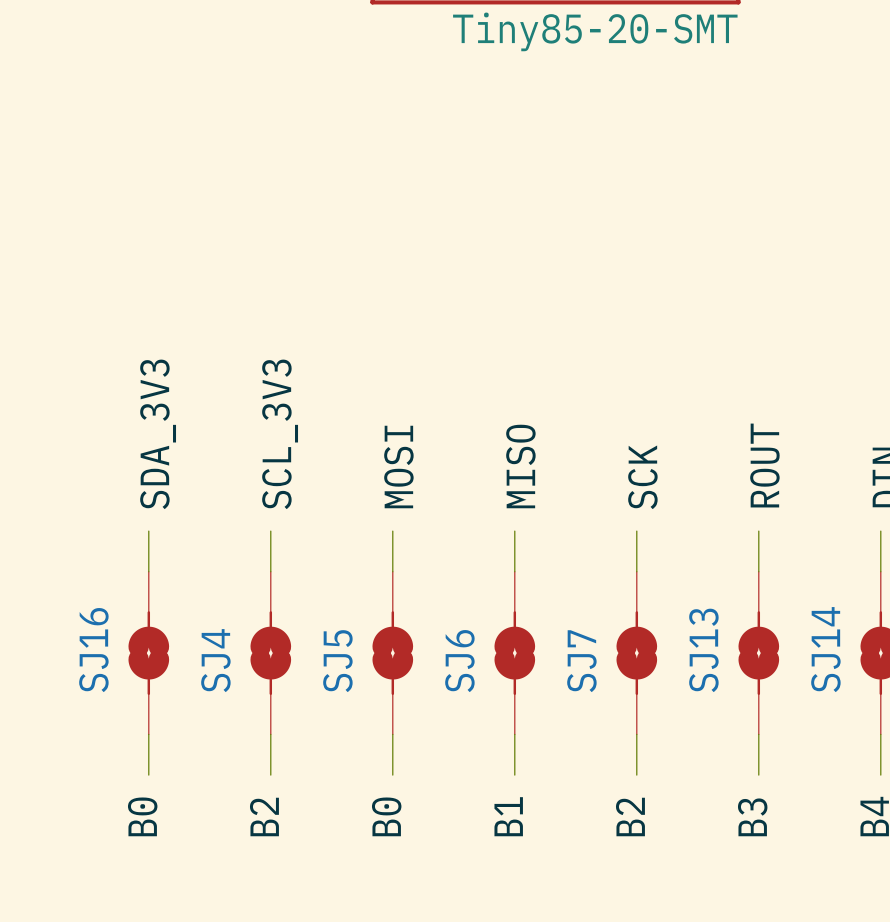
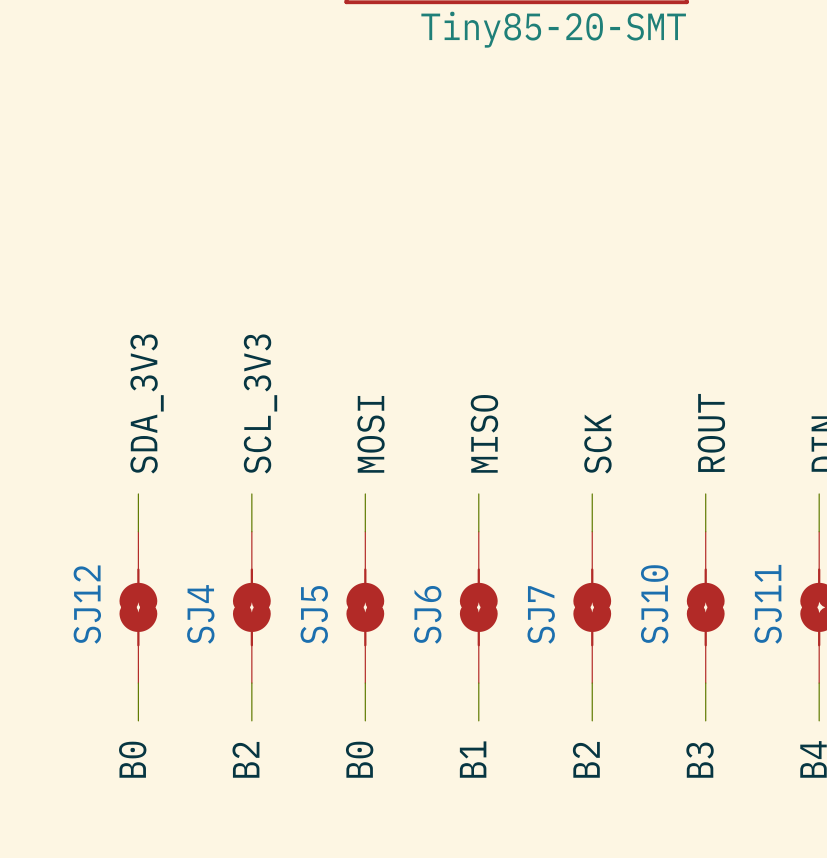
SJ14 name: SJ14 (825, 649) -> SJ11 (768, 604)
SJ16 name: SJ16 (93, 650) -> SJ12 (87, 604)
SJ13 name: SJ13 (703, 650) -> SJ10 (654, 604)

